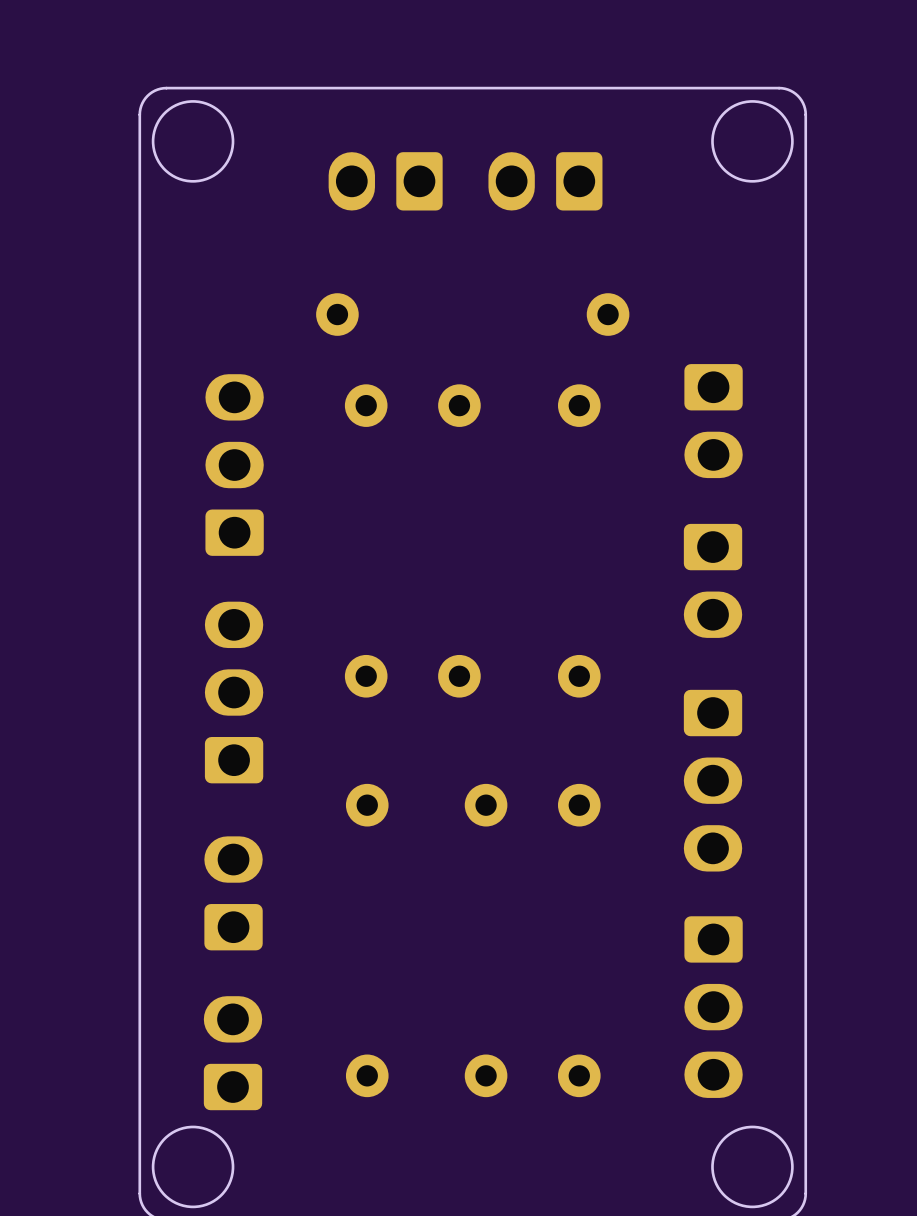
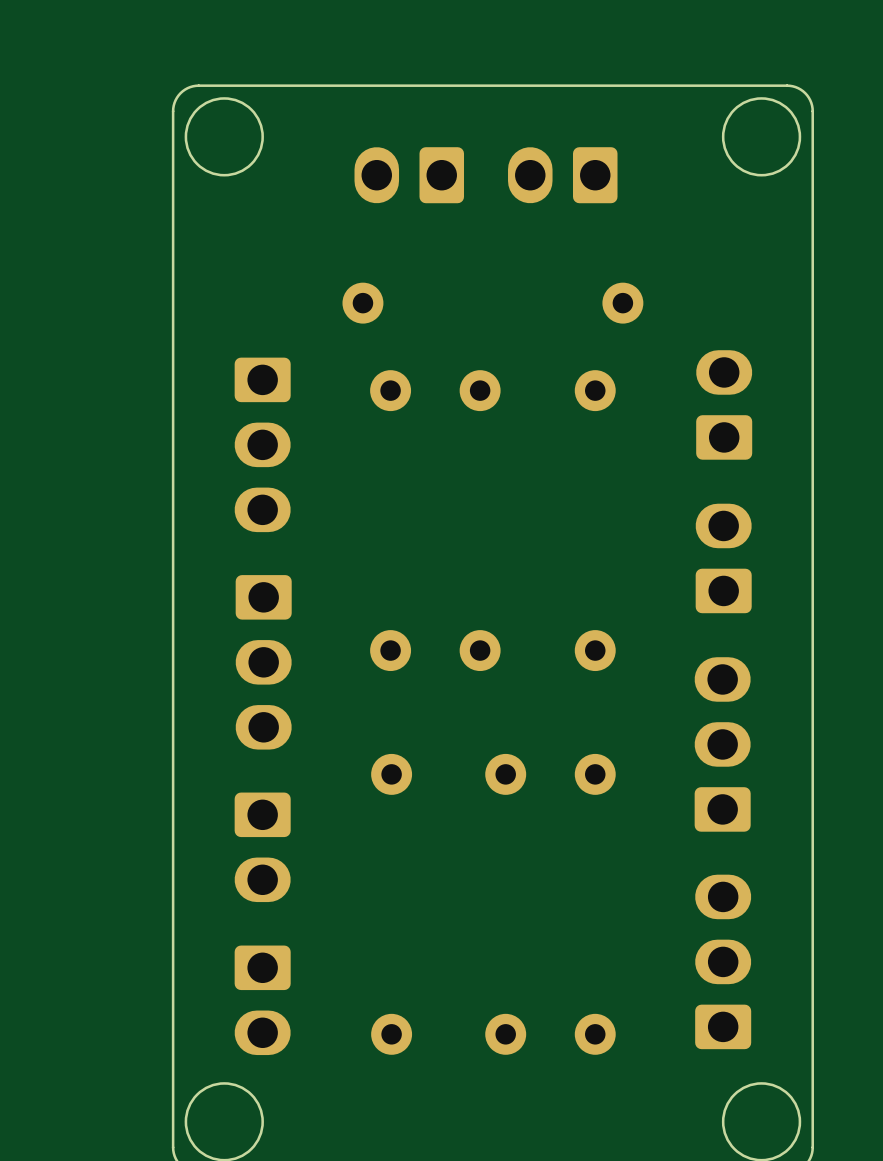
part rotation: 0° (713, 421) -> 180° (724, 404)
part rotation: 0° (234, 465) -> 180° (262, 444)
part rotation: 0° (713, 580) -> 180° (723, 558)
part rotation: 0° (234, 692) -> 180° (263, 662)
part rotation: 0° (713, 780) -> 180° (722, 744)
part rotation: 0° (233, 893) -> 180° (262, 847)
part rotation: 0° (713, 1007) -> 180° (723, 961)
part rotation: 0° (233, 1053) -> 180° (262, 1000)

